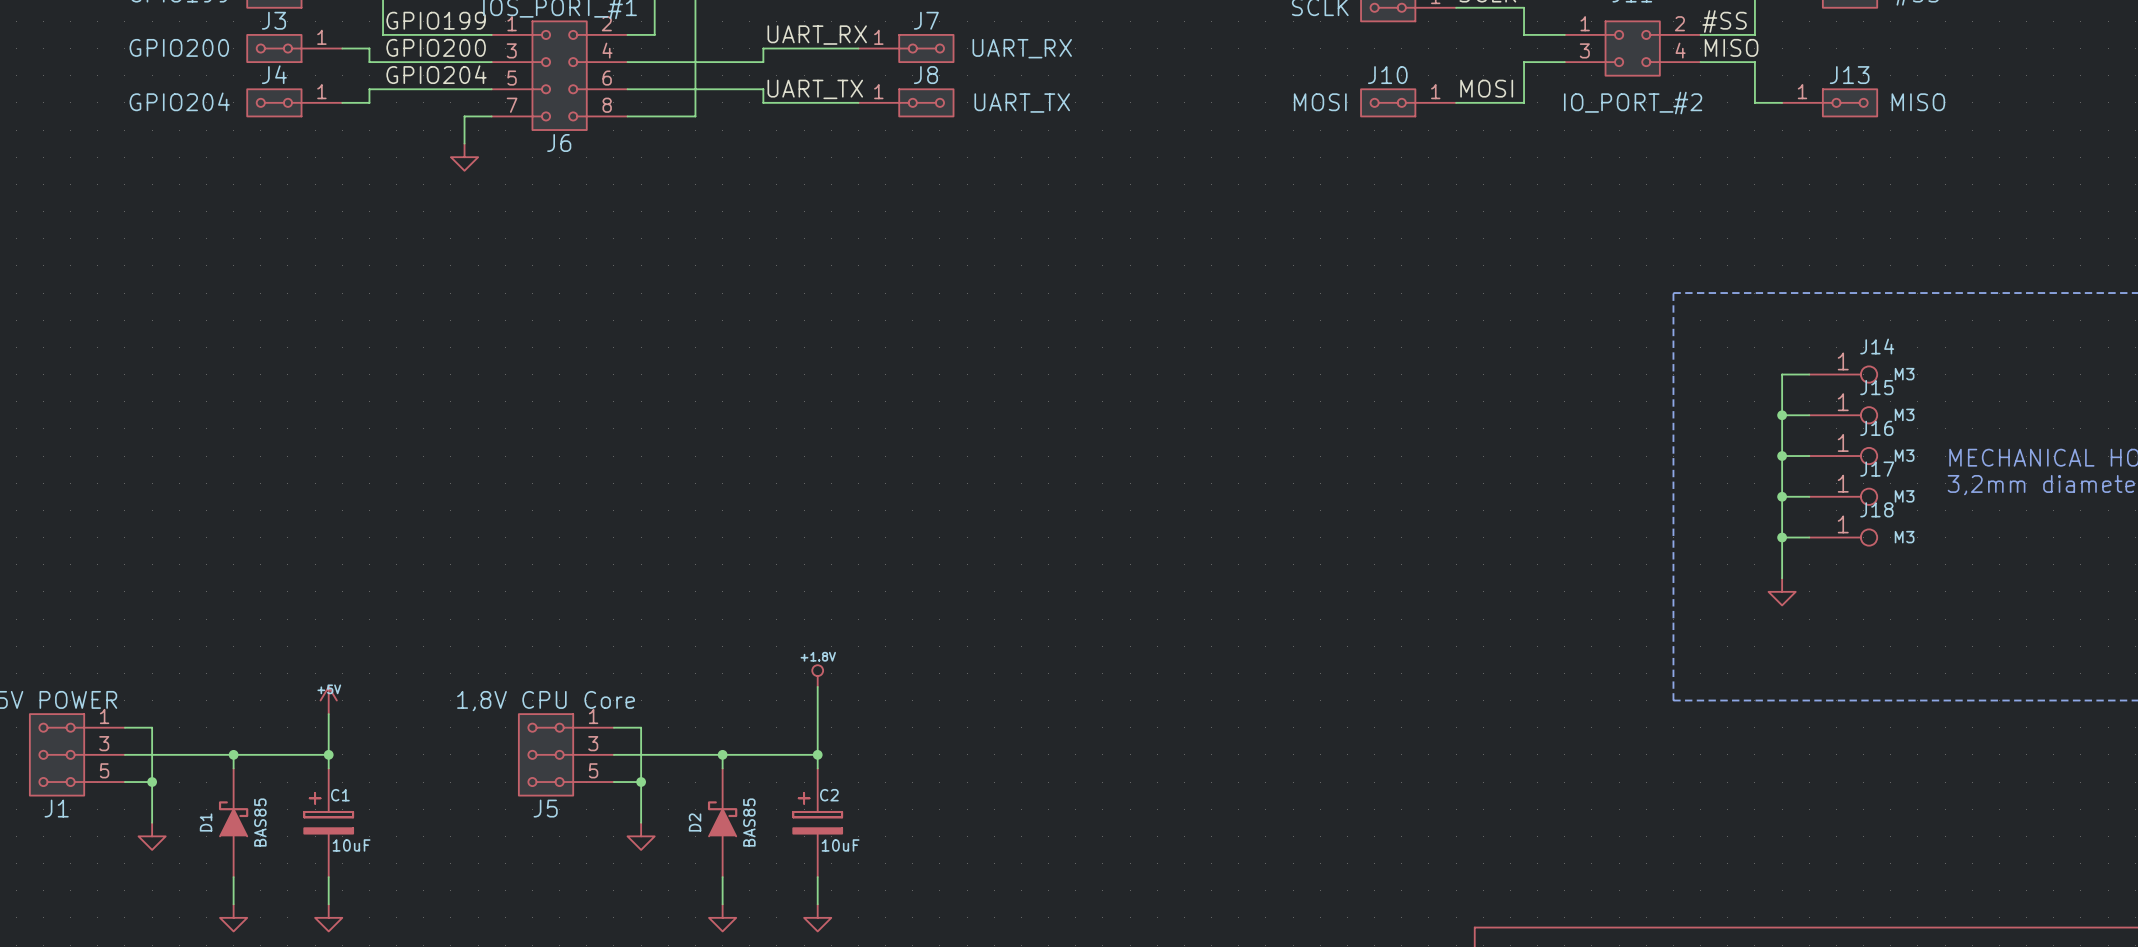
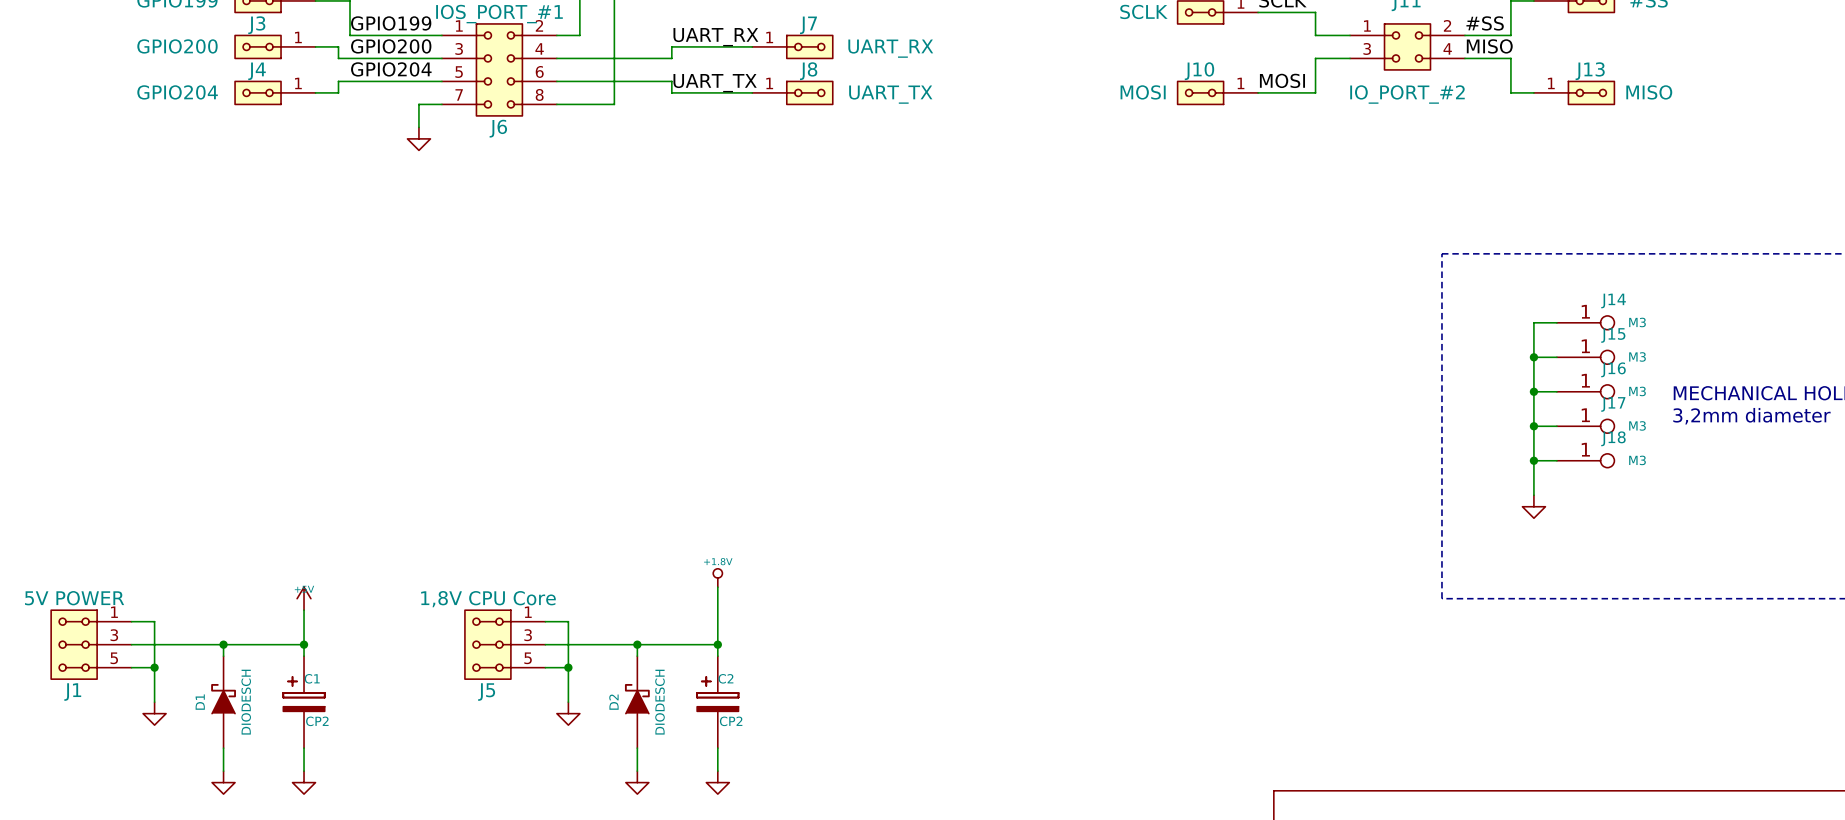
D1 value: BAS85 (260, 822) -> DIODESCH (246, 702)
D2 value: BAS85 (749, 822) -> DIODESCH (660, 702)
C1 value: 10uF (351, 845) -> CP2 (317, 721)
C2 value: 10uF (840, 845) -> CP2 (731, 721)

